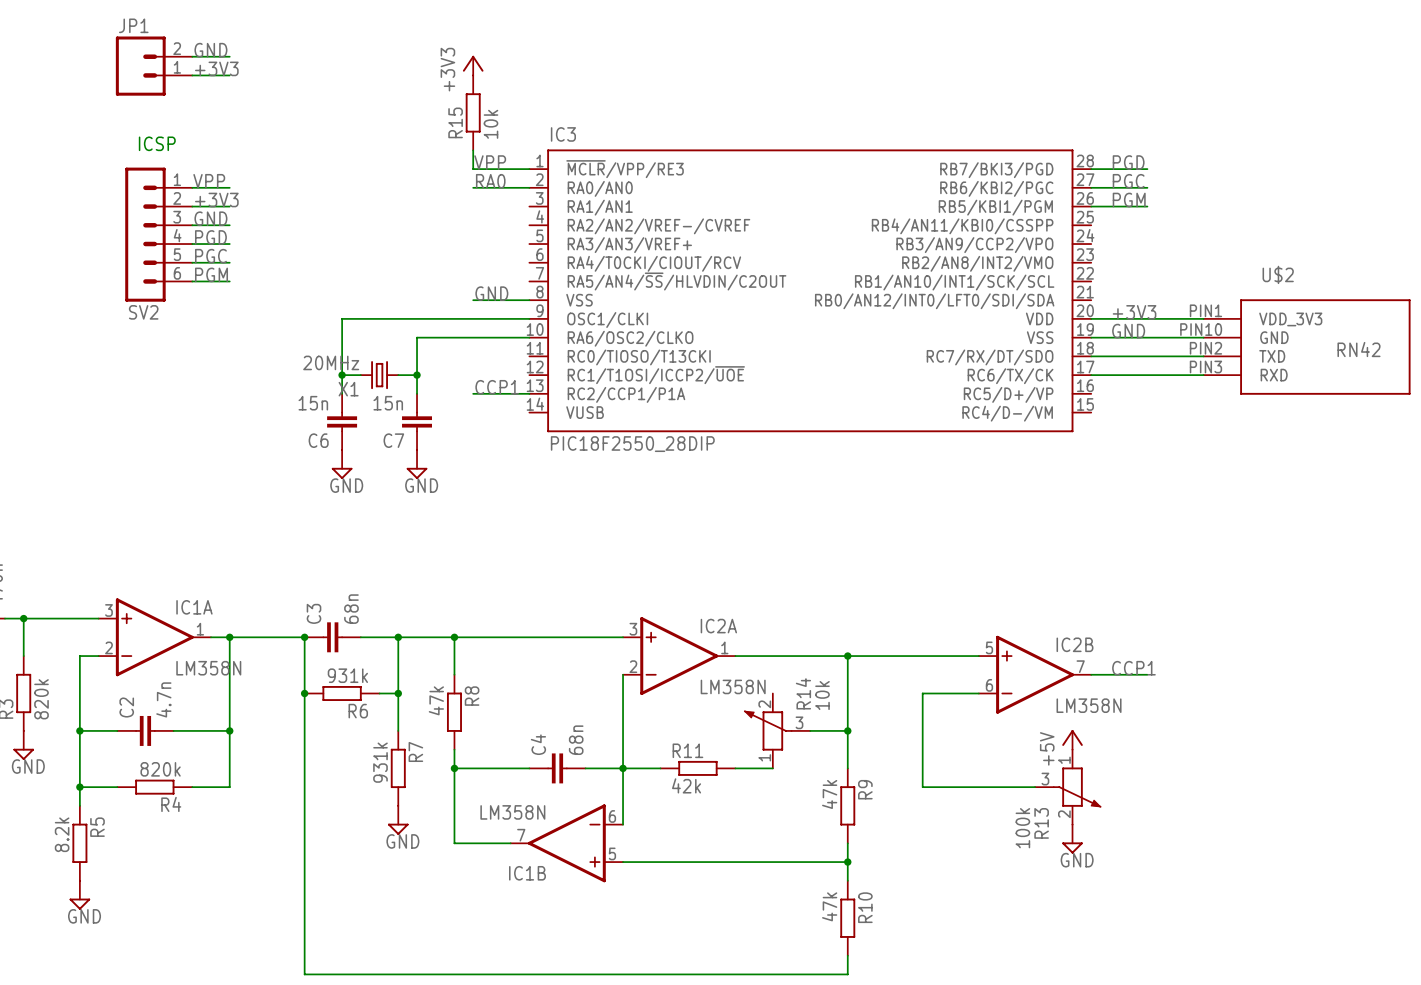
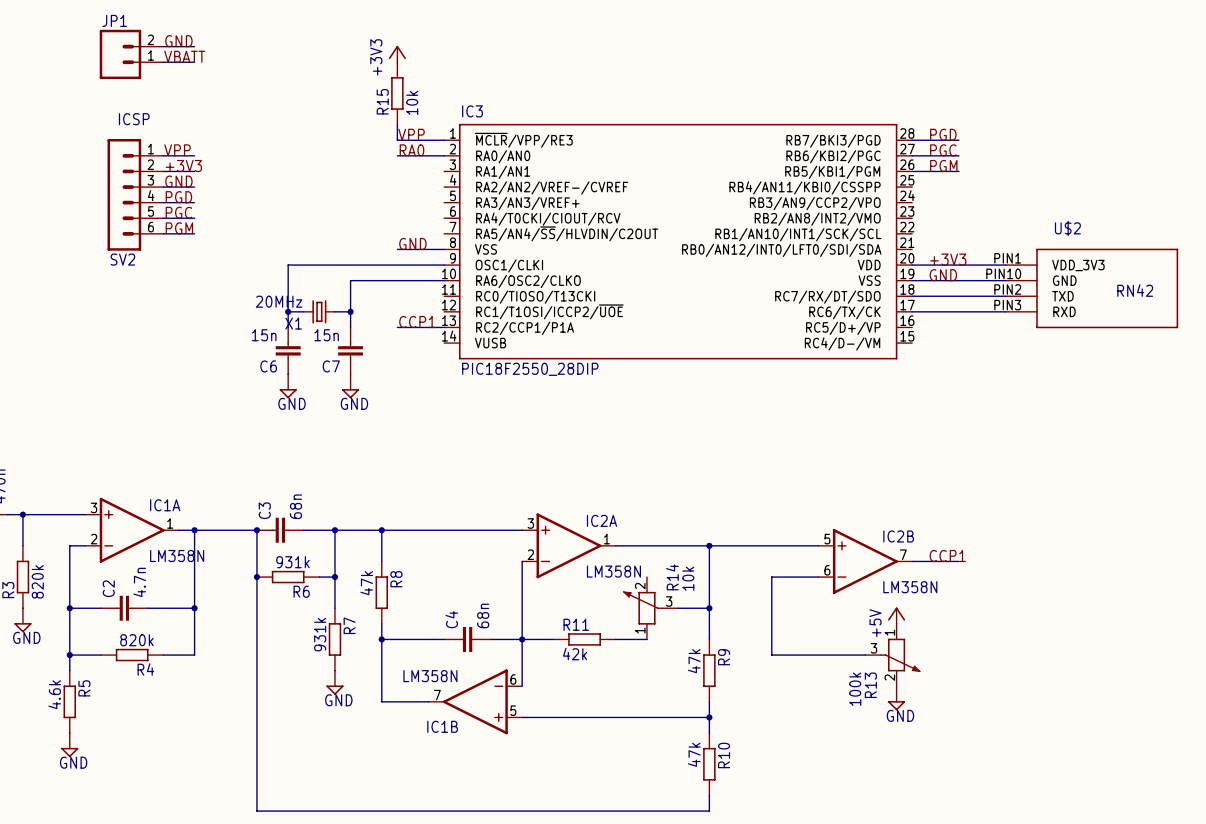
label: +3V3 (216, 68) -> VBATT (184, 56)
R5 value: 8.2k (62, 834) -> 4.6k (54, 694)

